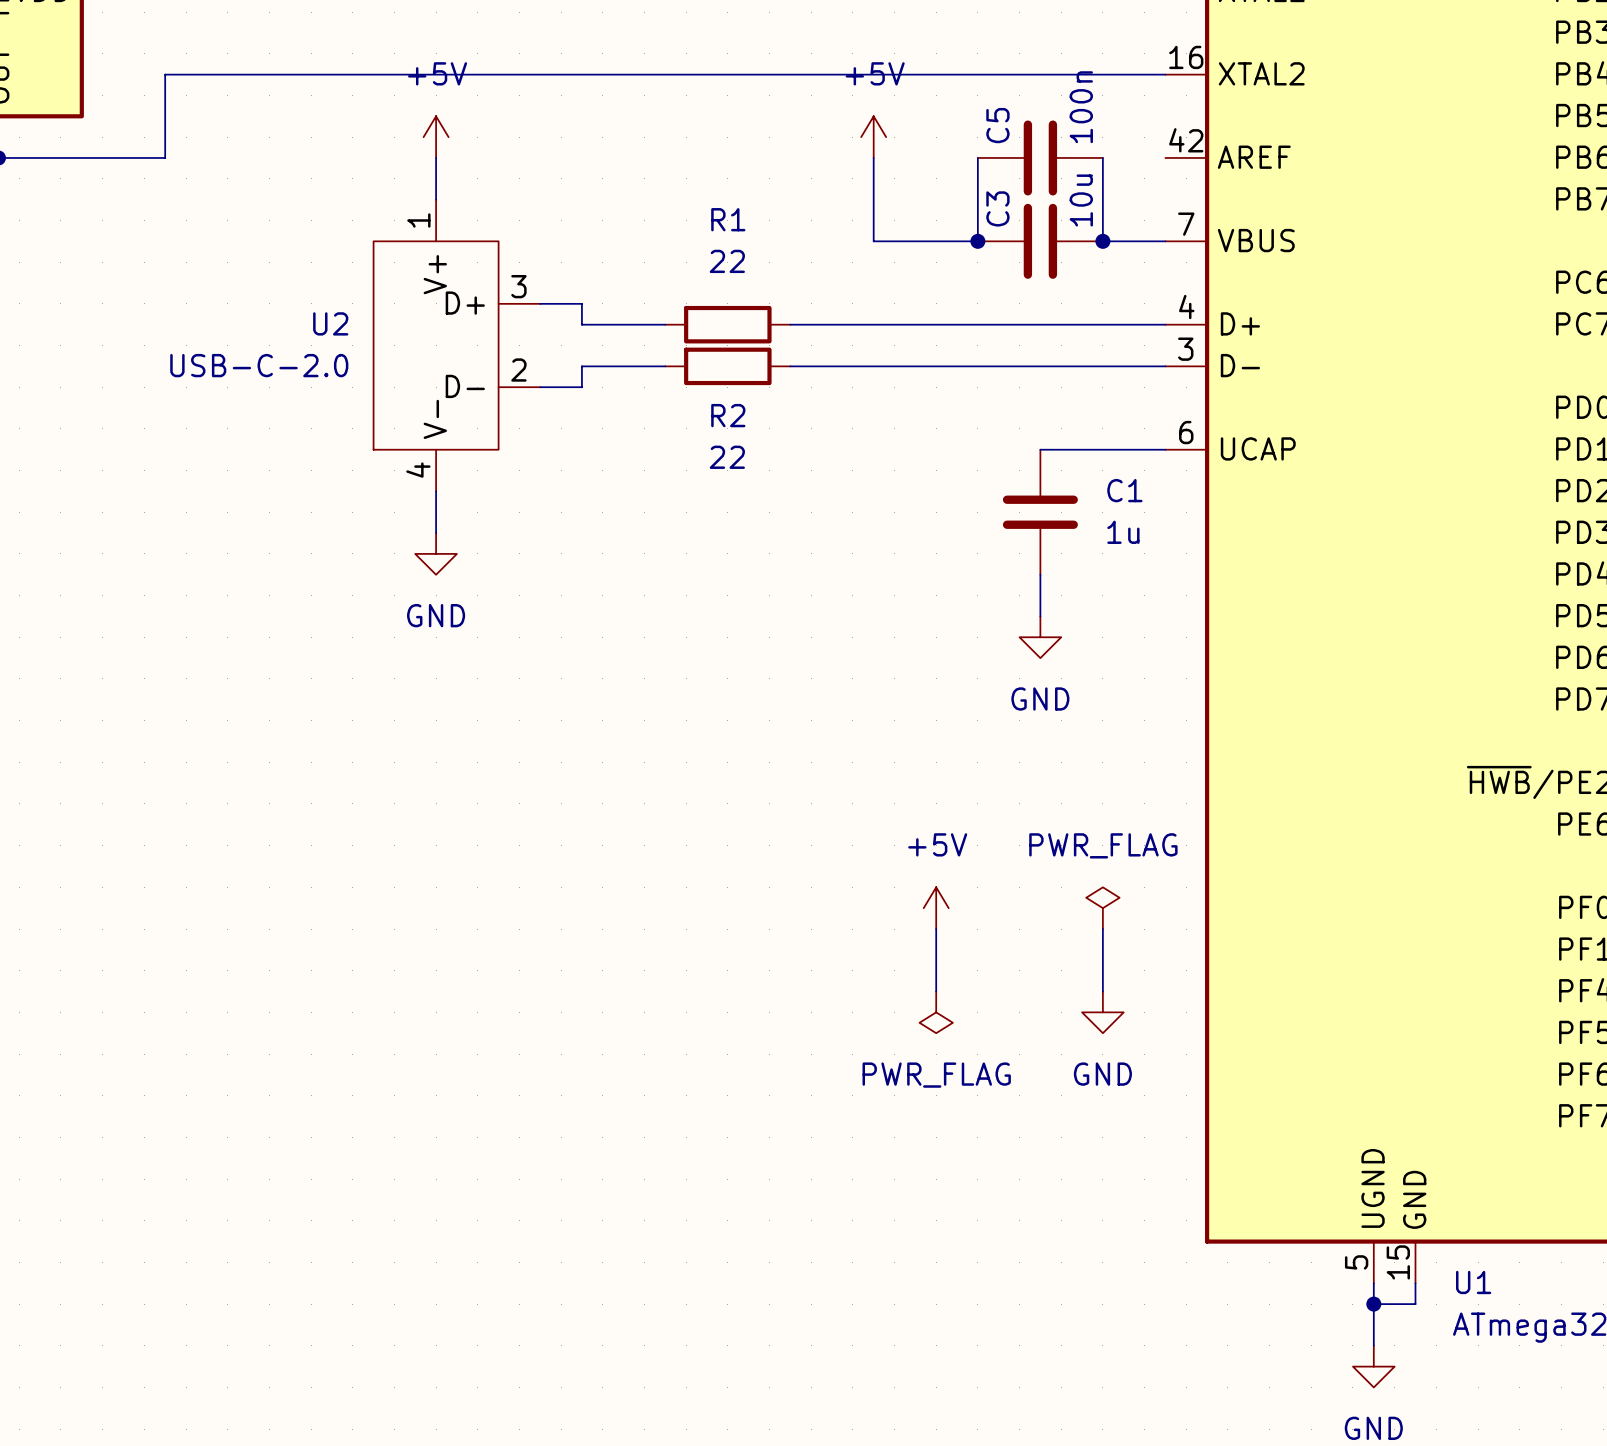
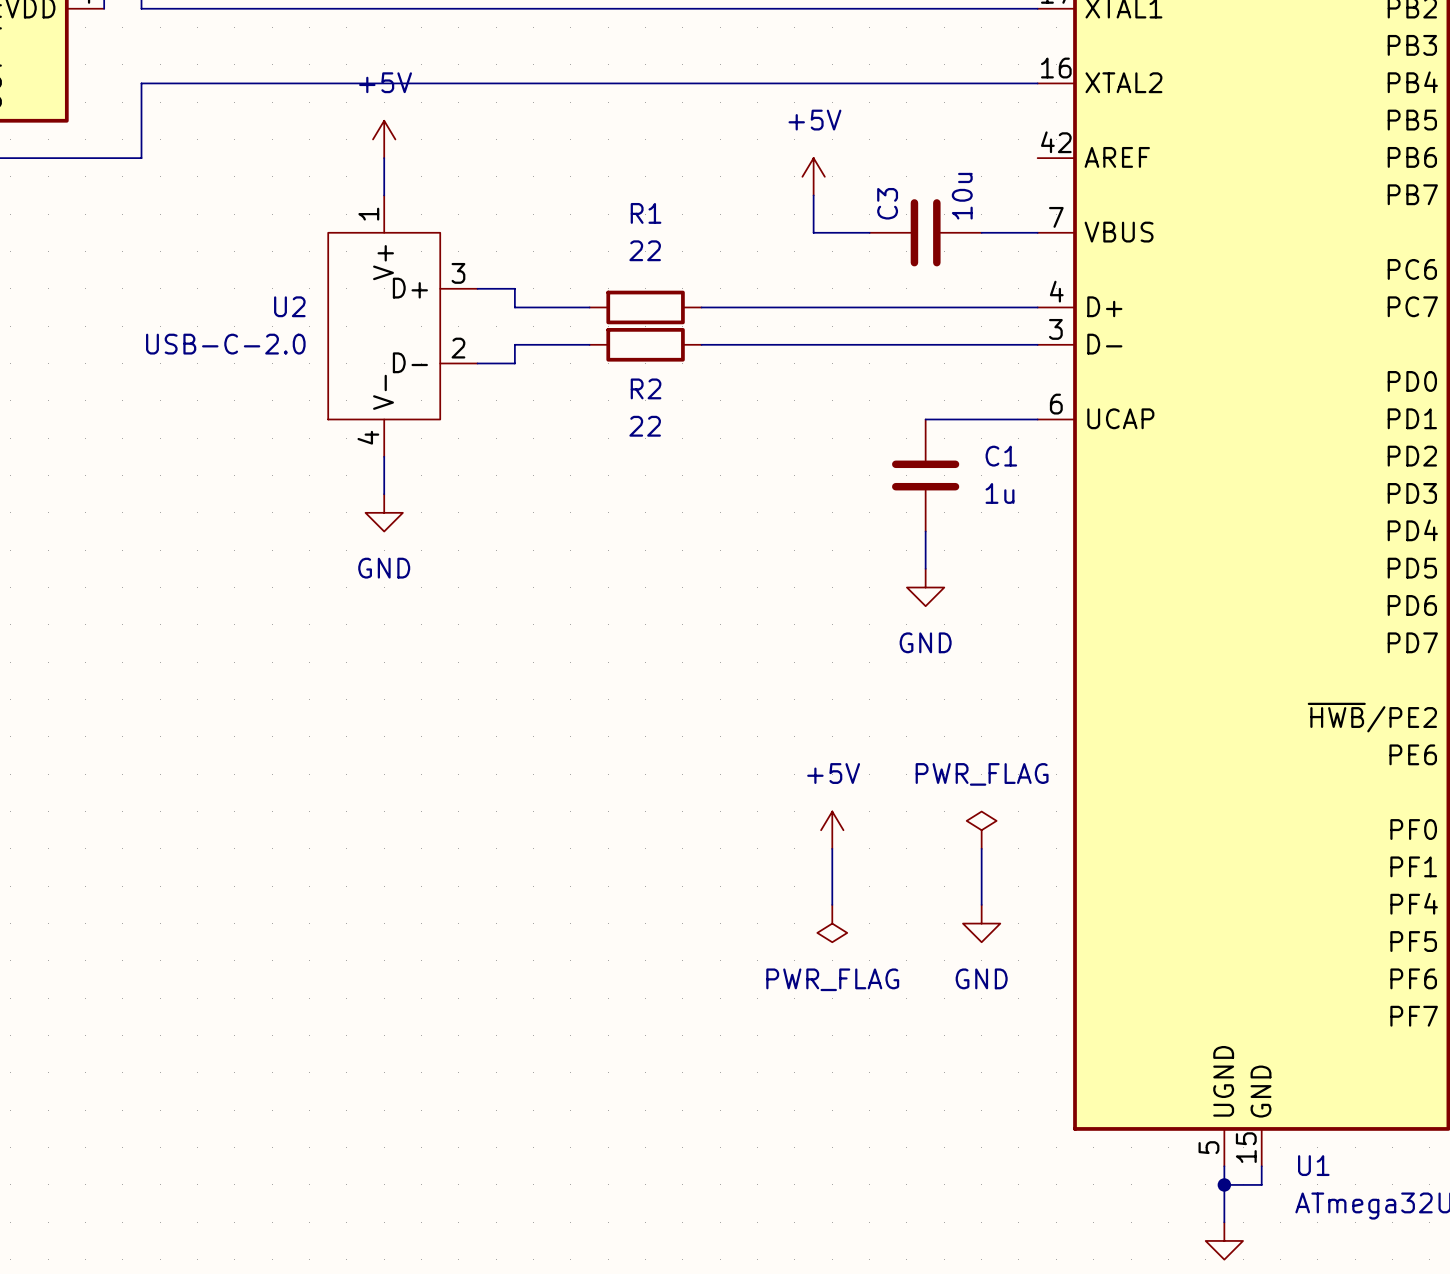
power symbol position: +5V (873, 137) -> +5V (813, 176)
wire: (873, 157) (873, 241) (915, 241) -> (813, 195) (813, 232)
wire: (977, 157) (977, 241) -> none
C5: 100n (1040, 157) -> none
wire: (1102, 157) (1102, 241) -> none
junction: (977, 241) -> none
junction: (1102, 241) -> none

